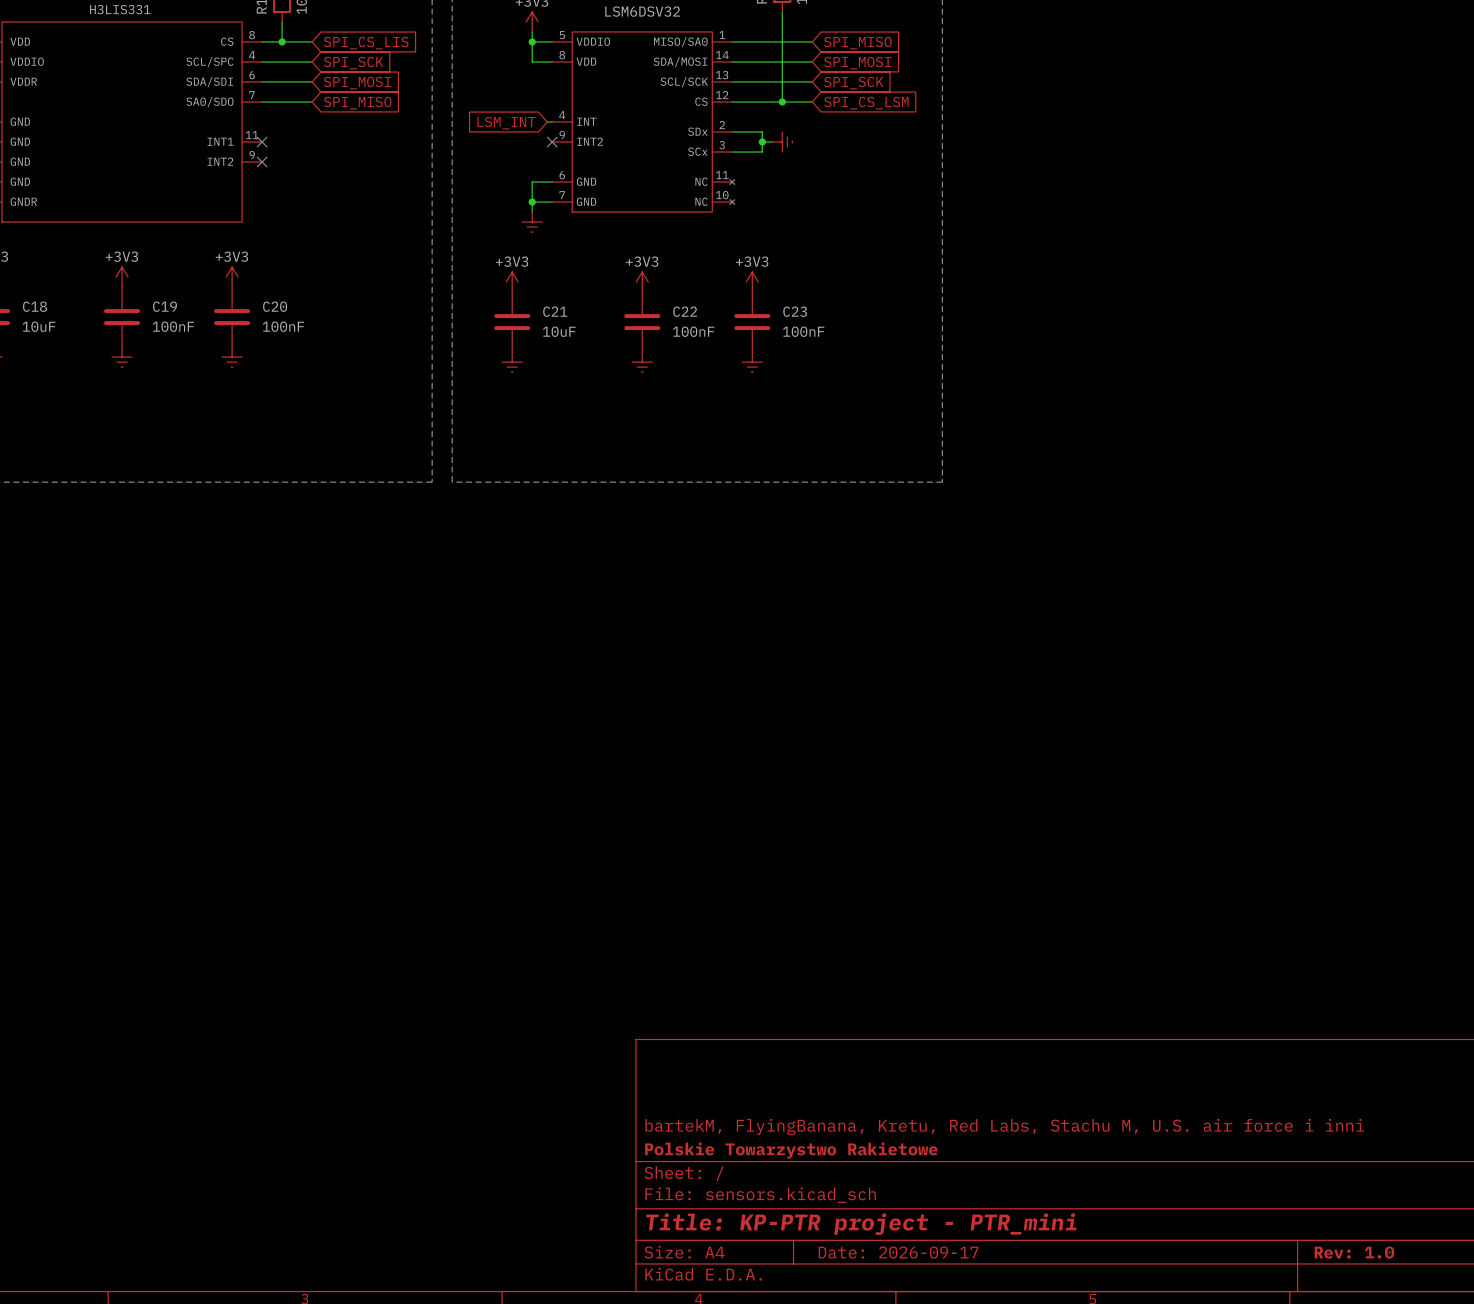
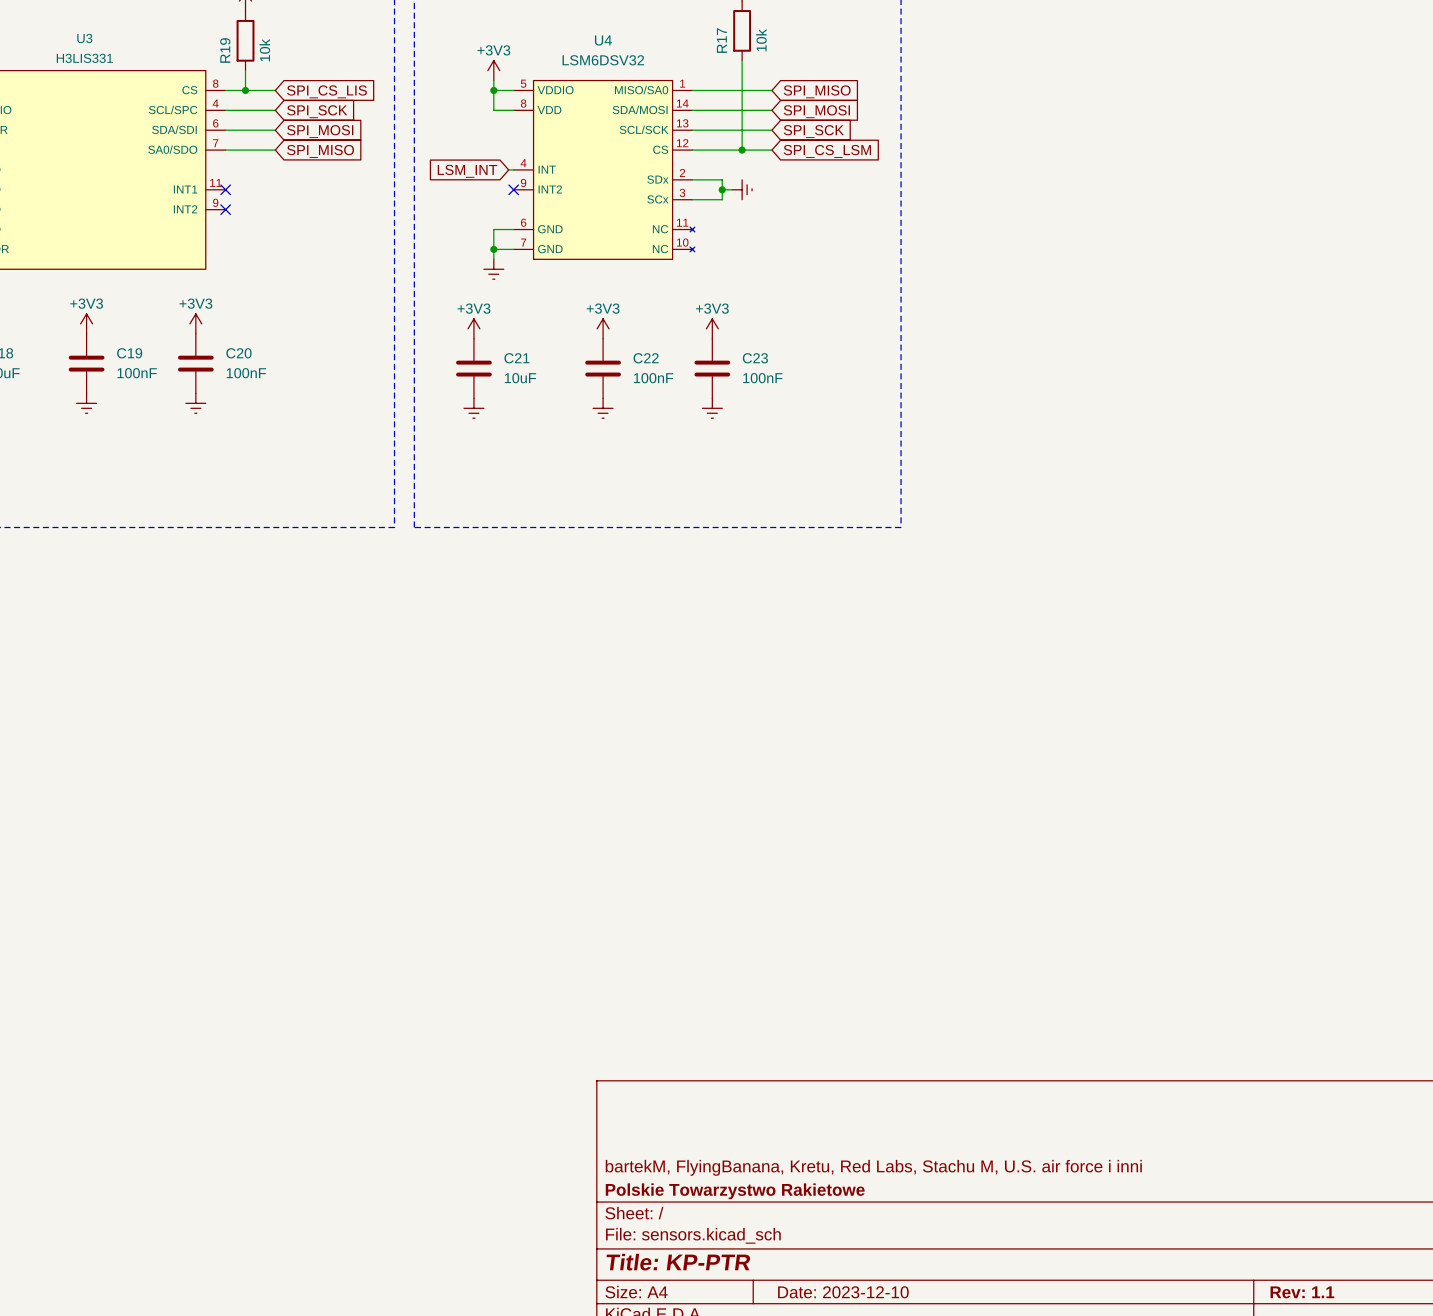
title block: Title: KP-PTR project - PTR_mini (861, 1224) -> Title: KP-PTR (678, 1262)
title block: Date: 2026-09-17 (898, 1252) -> Date: 2023-12-10 (843, 1292)
title block: Rev: 1.0 (1354, 1252) -> Rev: 1.1 (1302, 1292)

